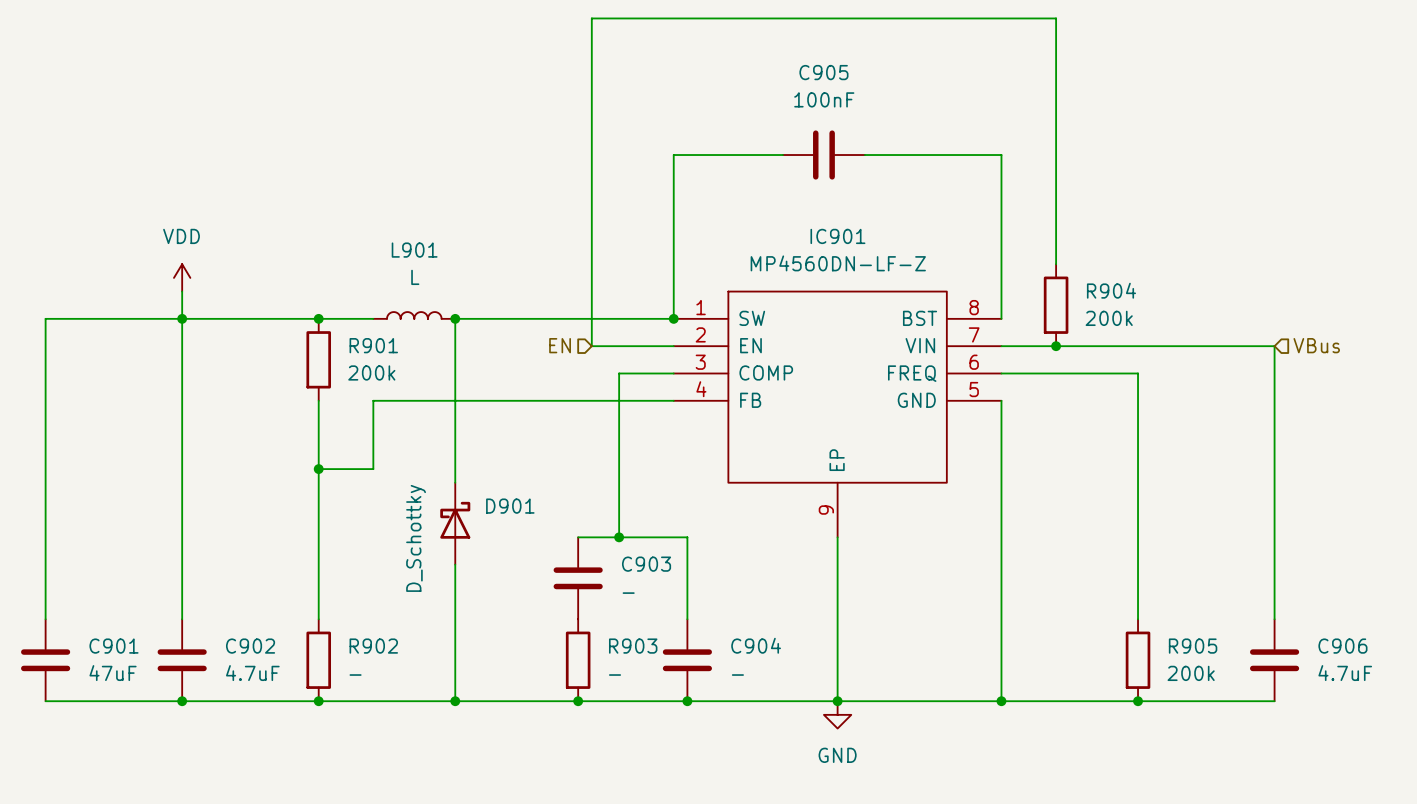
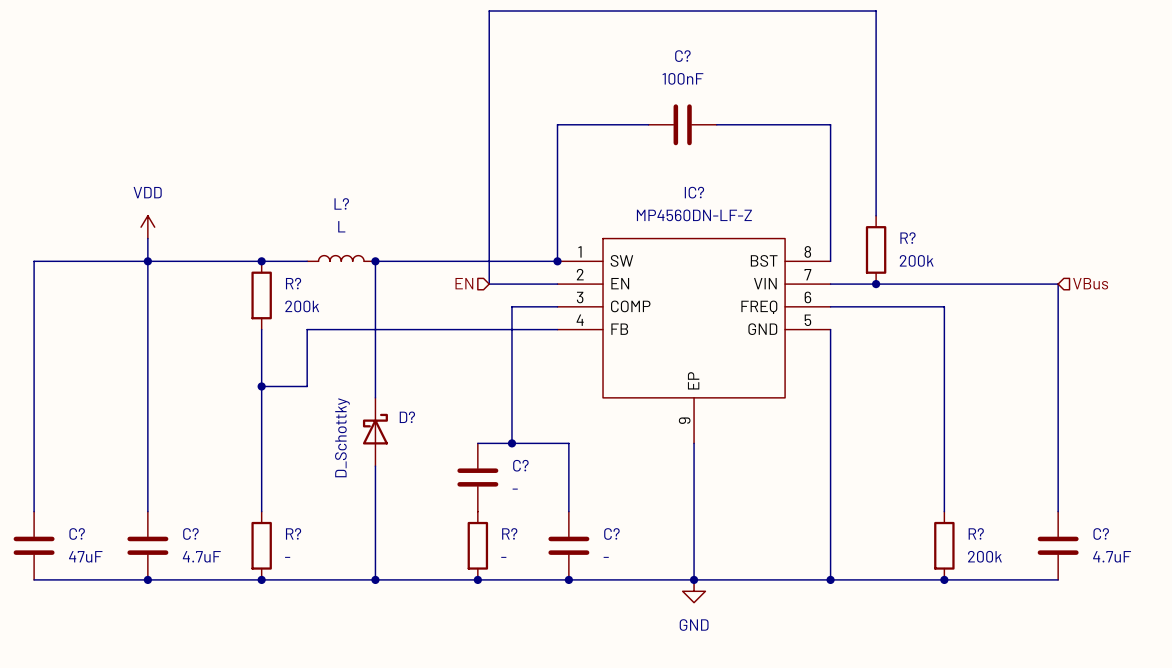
C905 name: C905 (823, 72) -> C? (682, 56)
IC901 name: IC901 (837, 236) -> IC? (694, 192)
L901 name: L901 (414, 250) -> L? (341, 203)
R904 name: R904 (1111, 290) -> R? (907, 238)
R901 name: R901 (373, 345) -> R? (293, 283)
D901 name: D901 (510, 506) -> D? (407, 417)
C903 name: C903 (646, 564) -> C? (520, 465)
C904 name: C904 (756, 645) -> C? (611, 533)
C901 name: C901 (113, 646) -> C? (77, 533)
C902 name: C902 (250, 646) -> C? (190, 533)
R902 name: R902 (373, 646) -> R? (293, 533)
R903 name: R903 (633, 646) -> R? (509, 533)
R905 name: R905 (1193, 646) -> R? (976, 533)
C906 name: C906 (1342, 646) -> C? (1101, 533)

